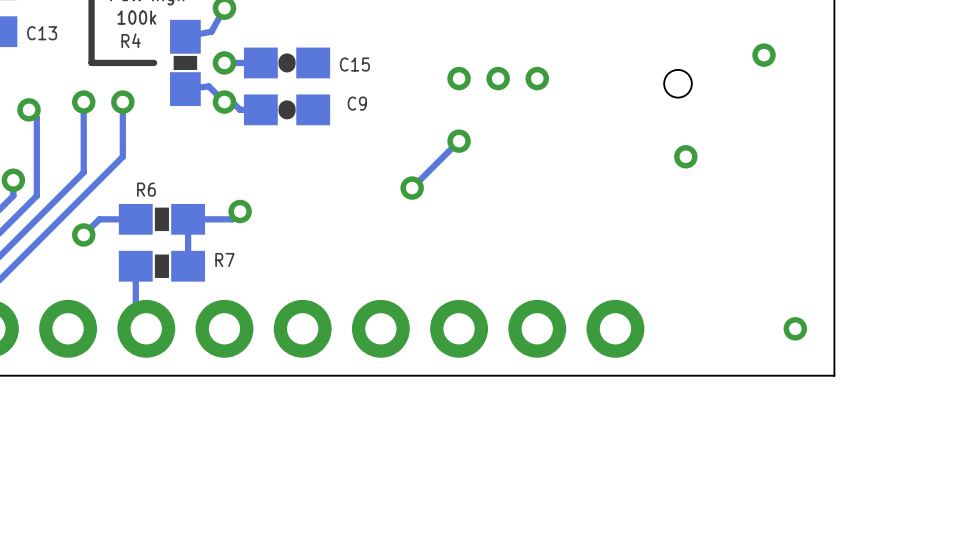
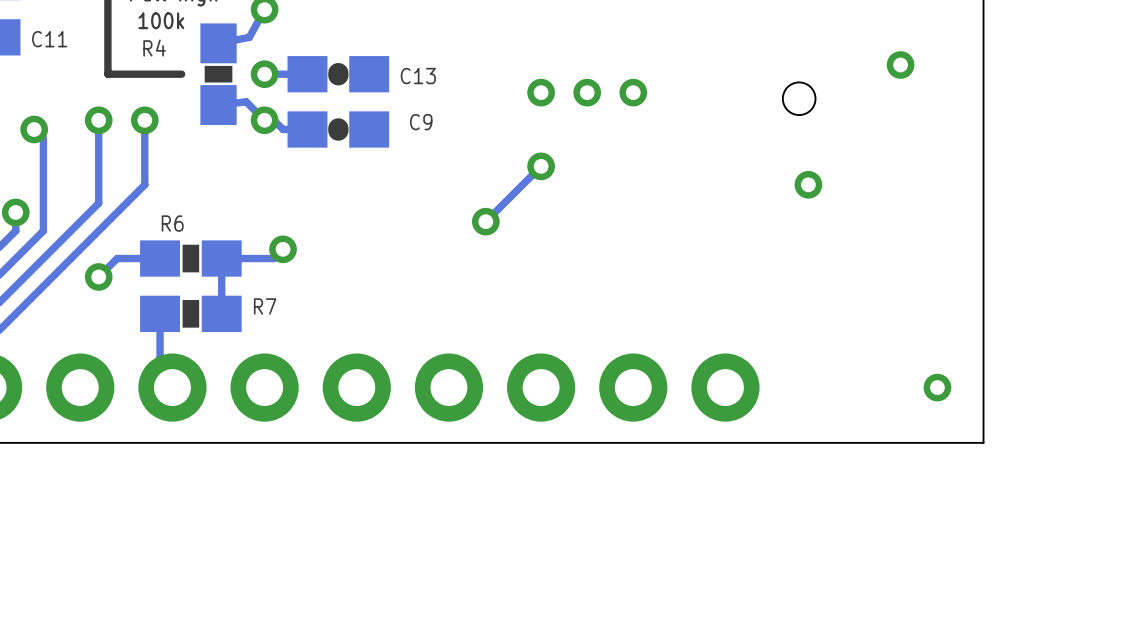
C13 name: C13 (42, 33) -> C11 (49, 39)
C15 name: C15 (354, 64) -> C13 (418, 76)

